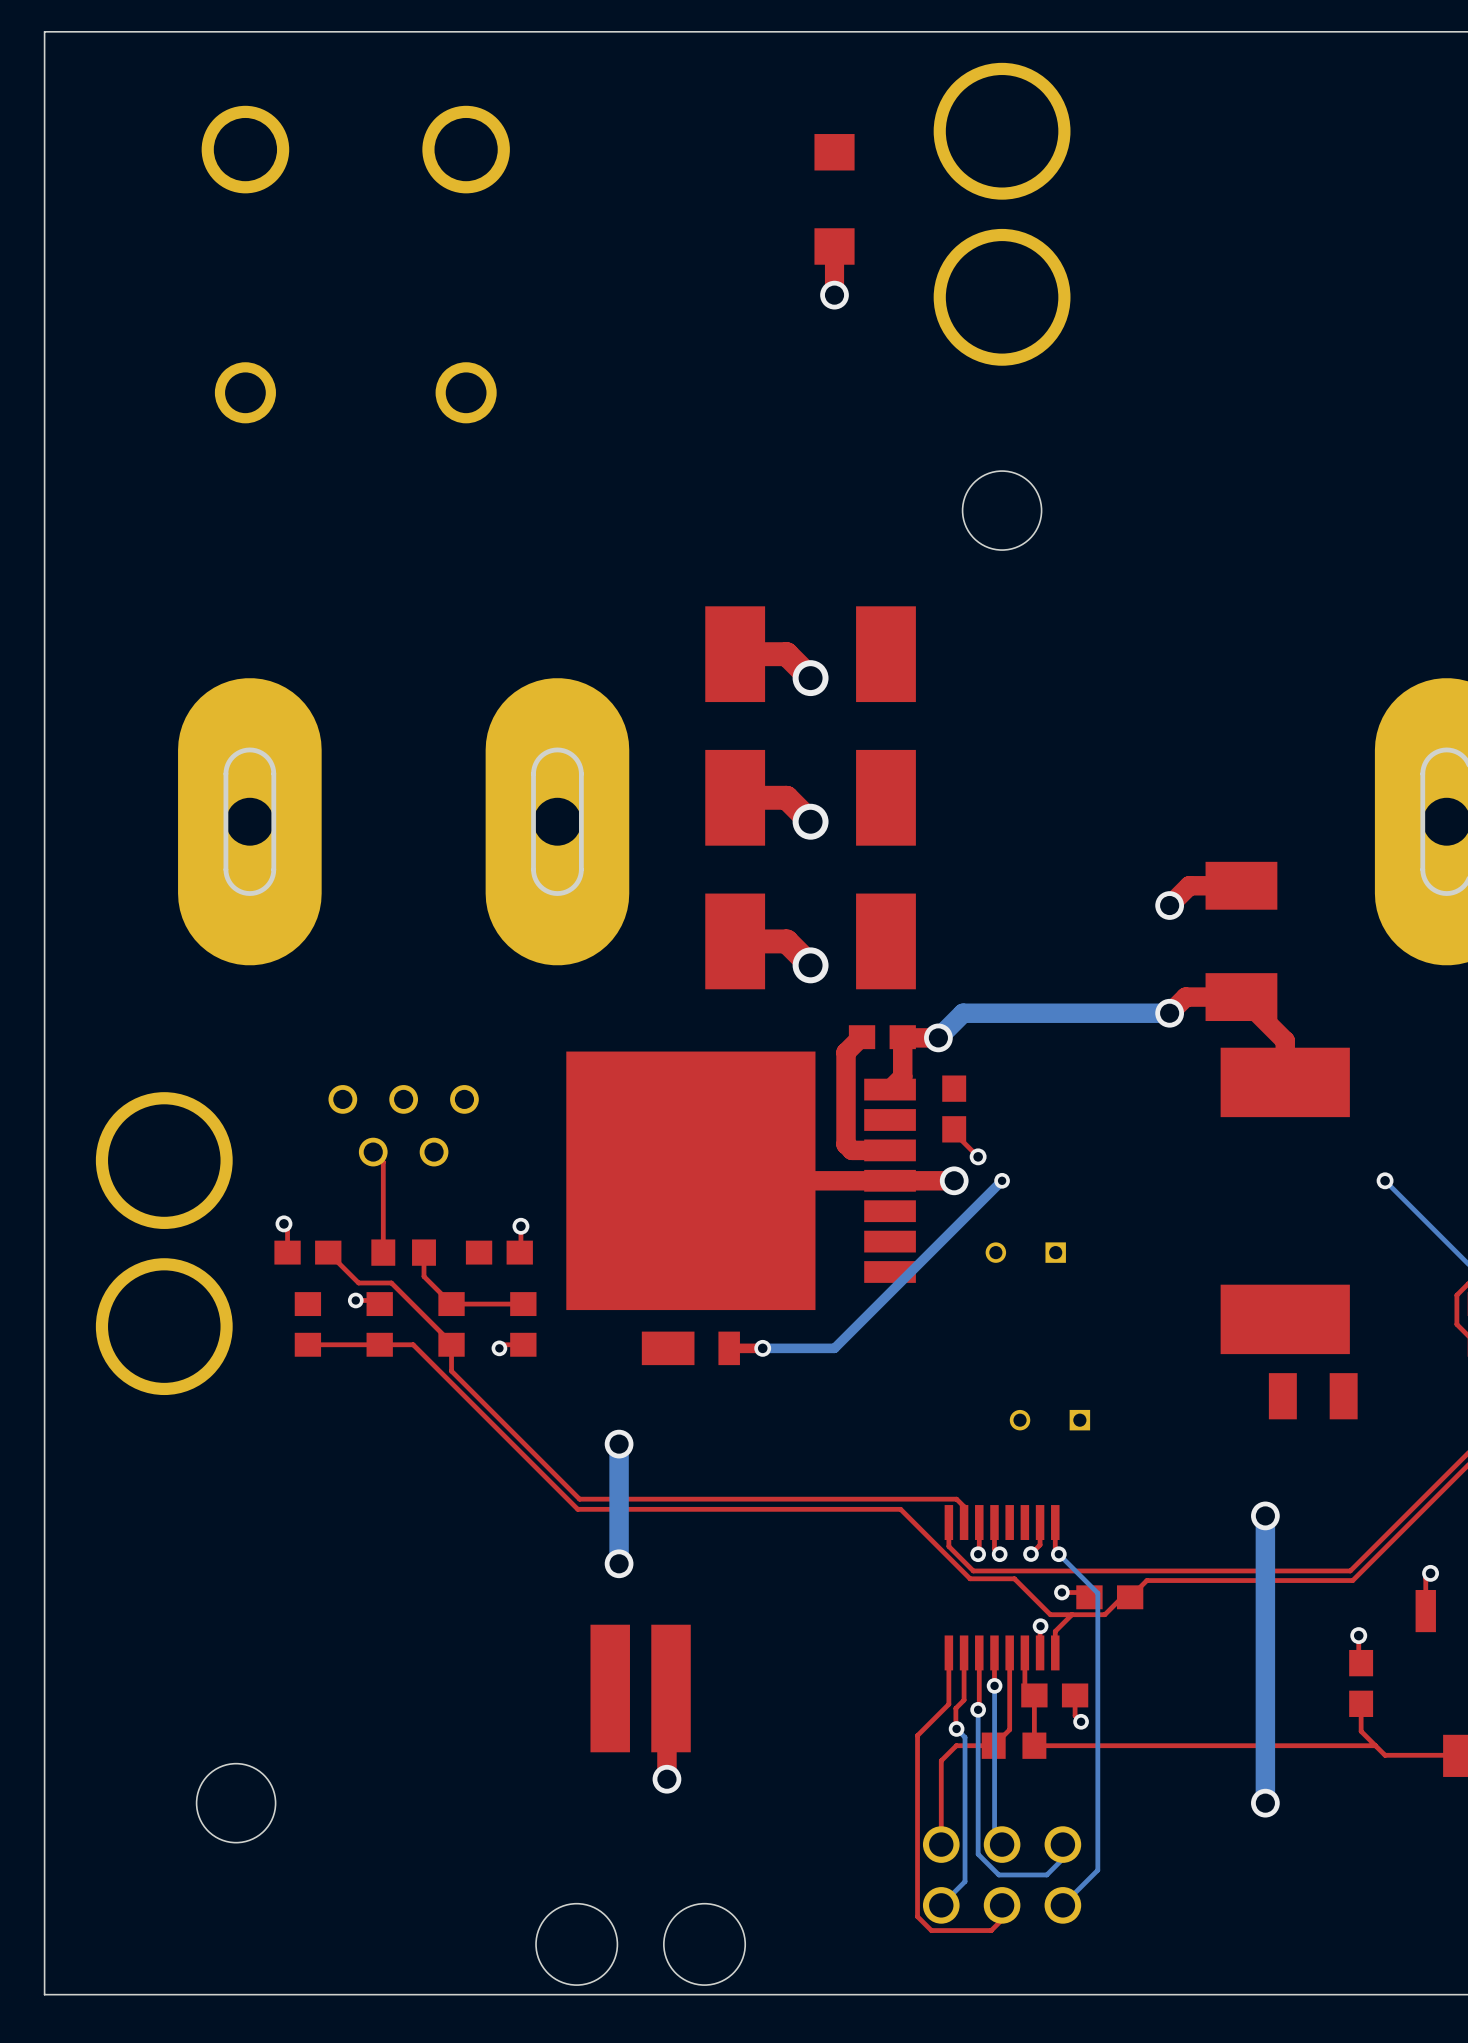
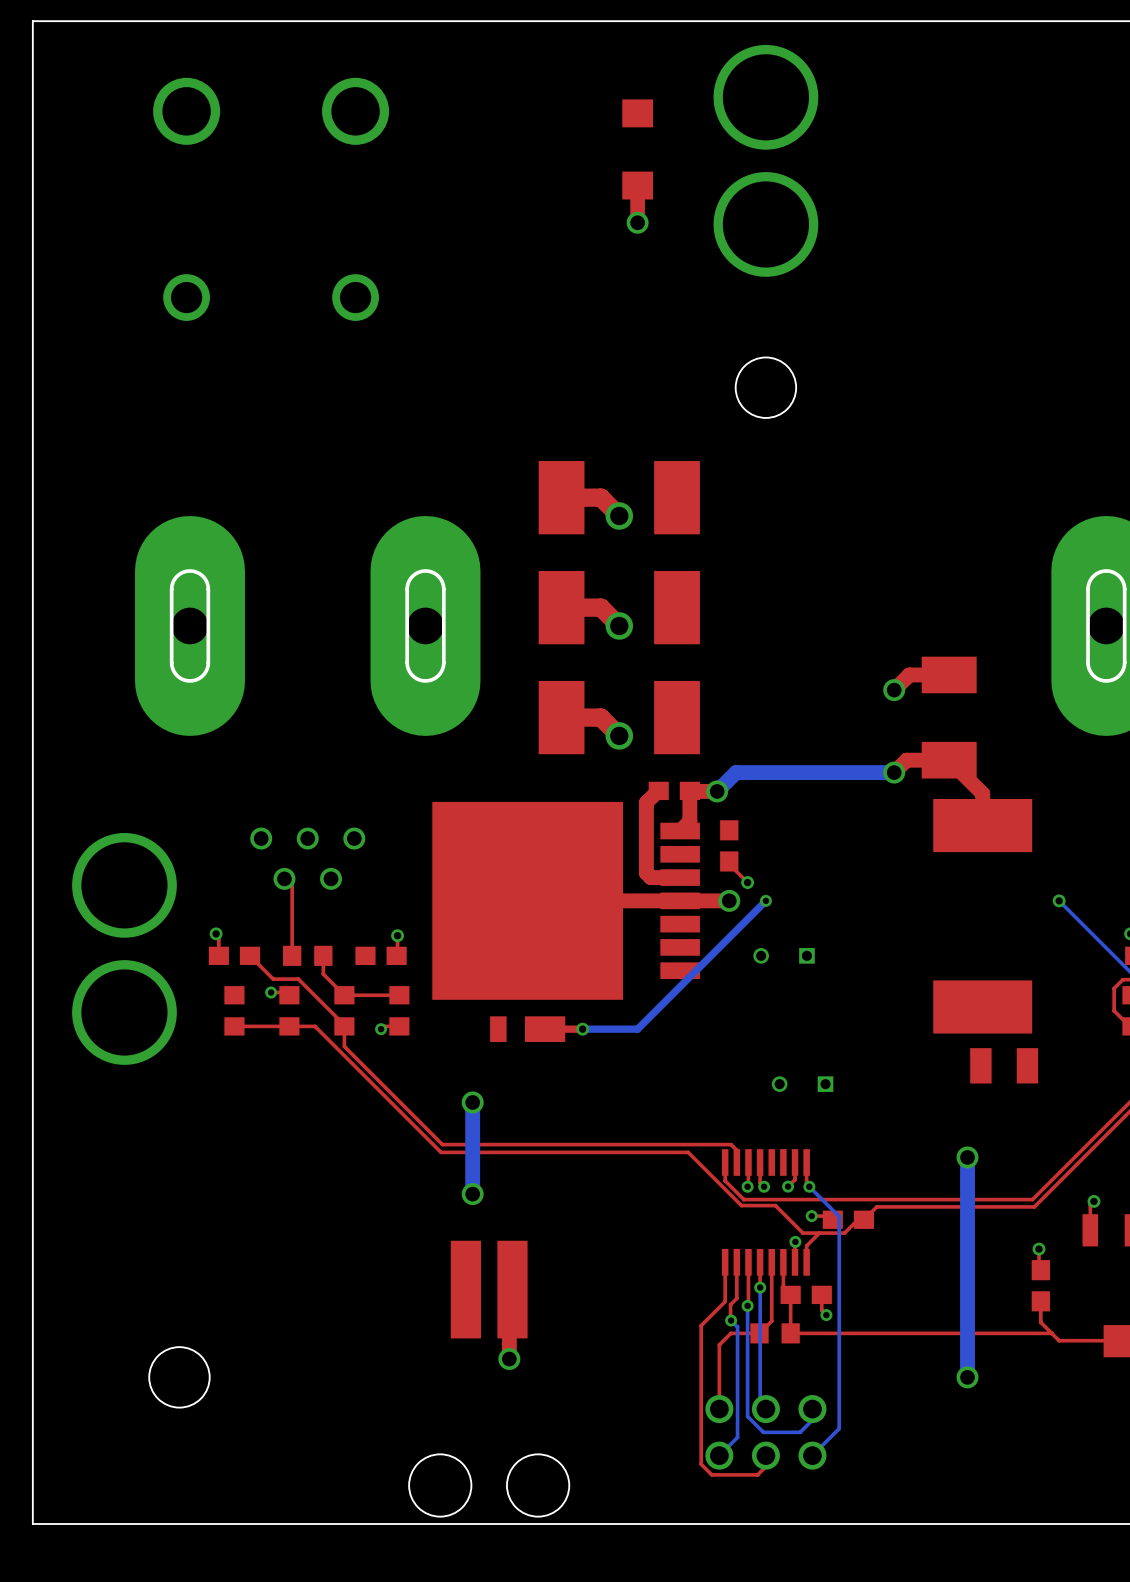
part rotation: 0° (690, 1348) -> 180° (527, 1029)

